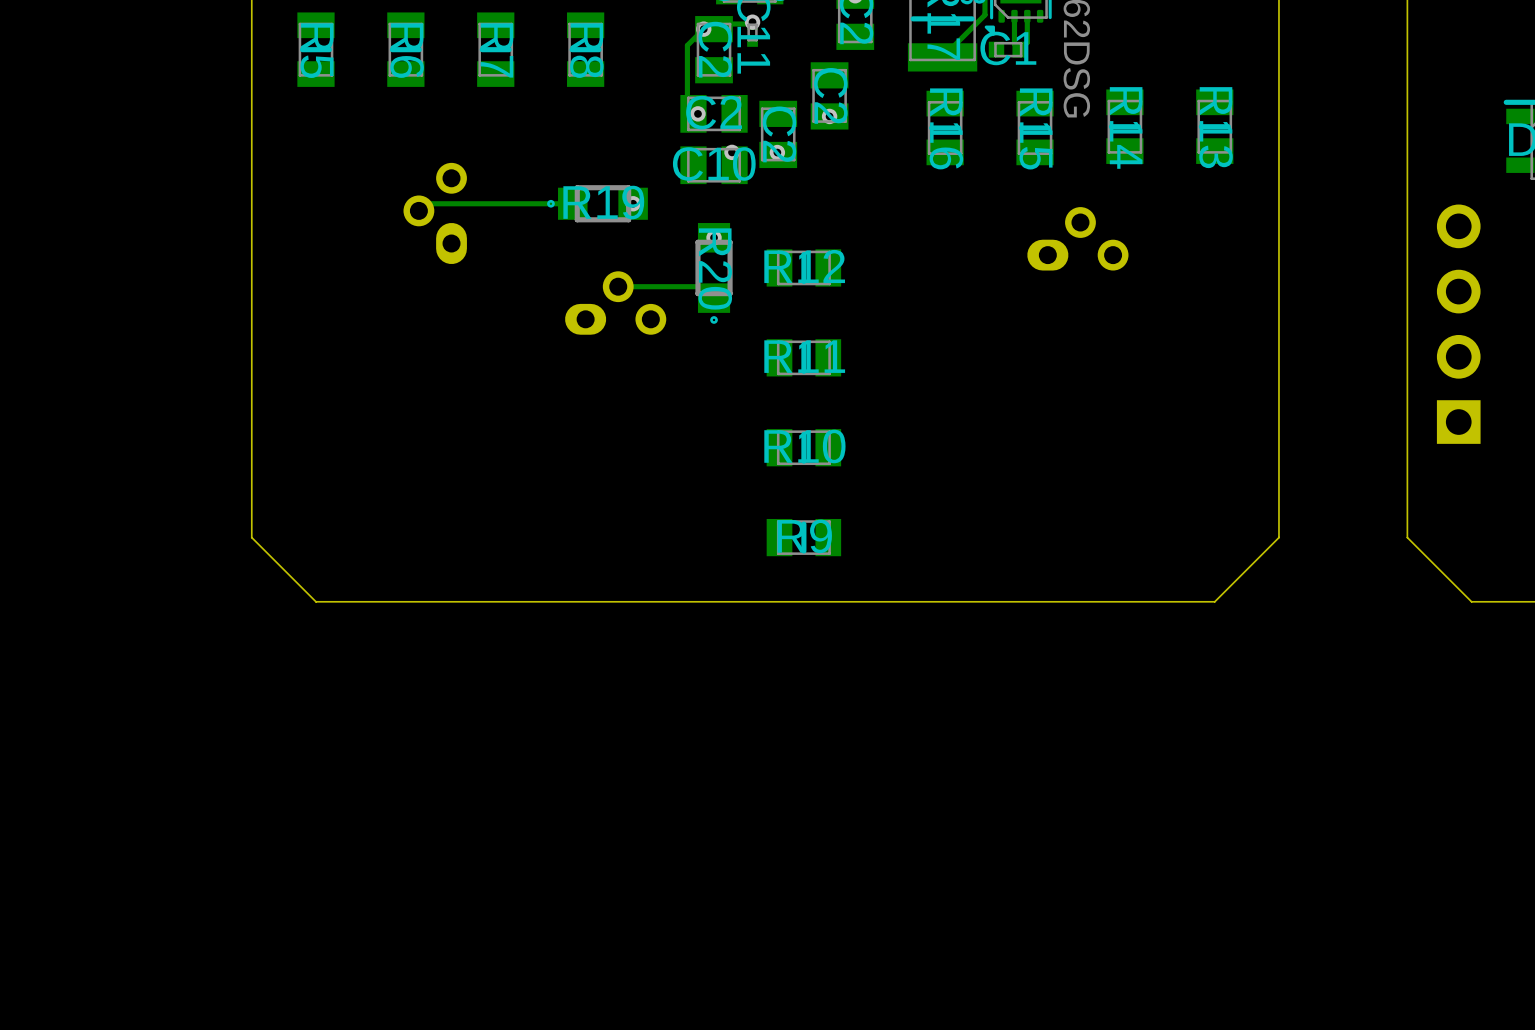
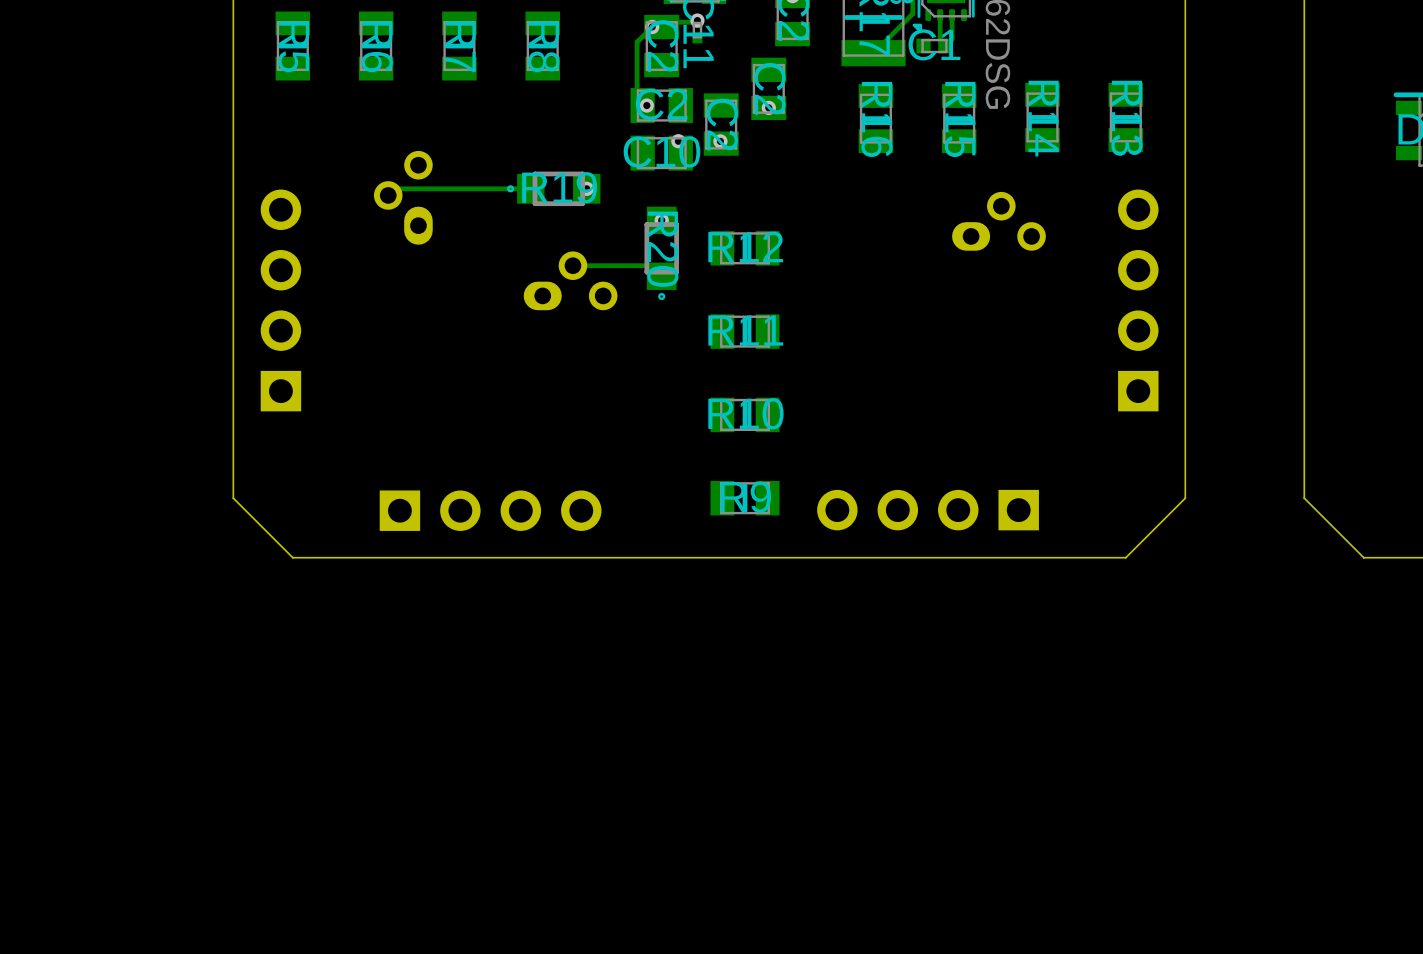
part: none -> (280, 300)
part position: (1458, 324) -> (1138, 300)
part: none -> (928, 510)
part: none -> (490, 510)

